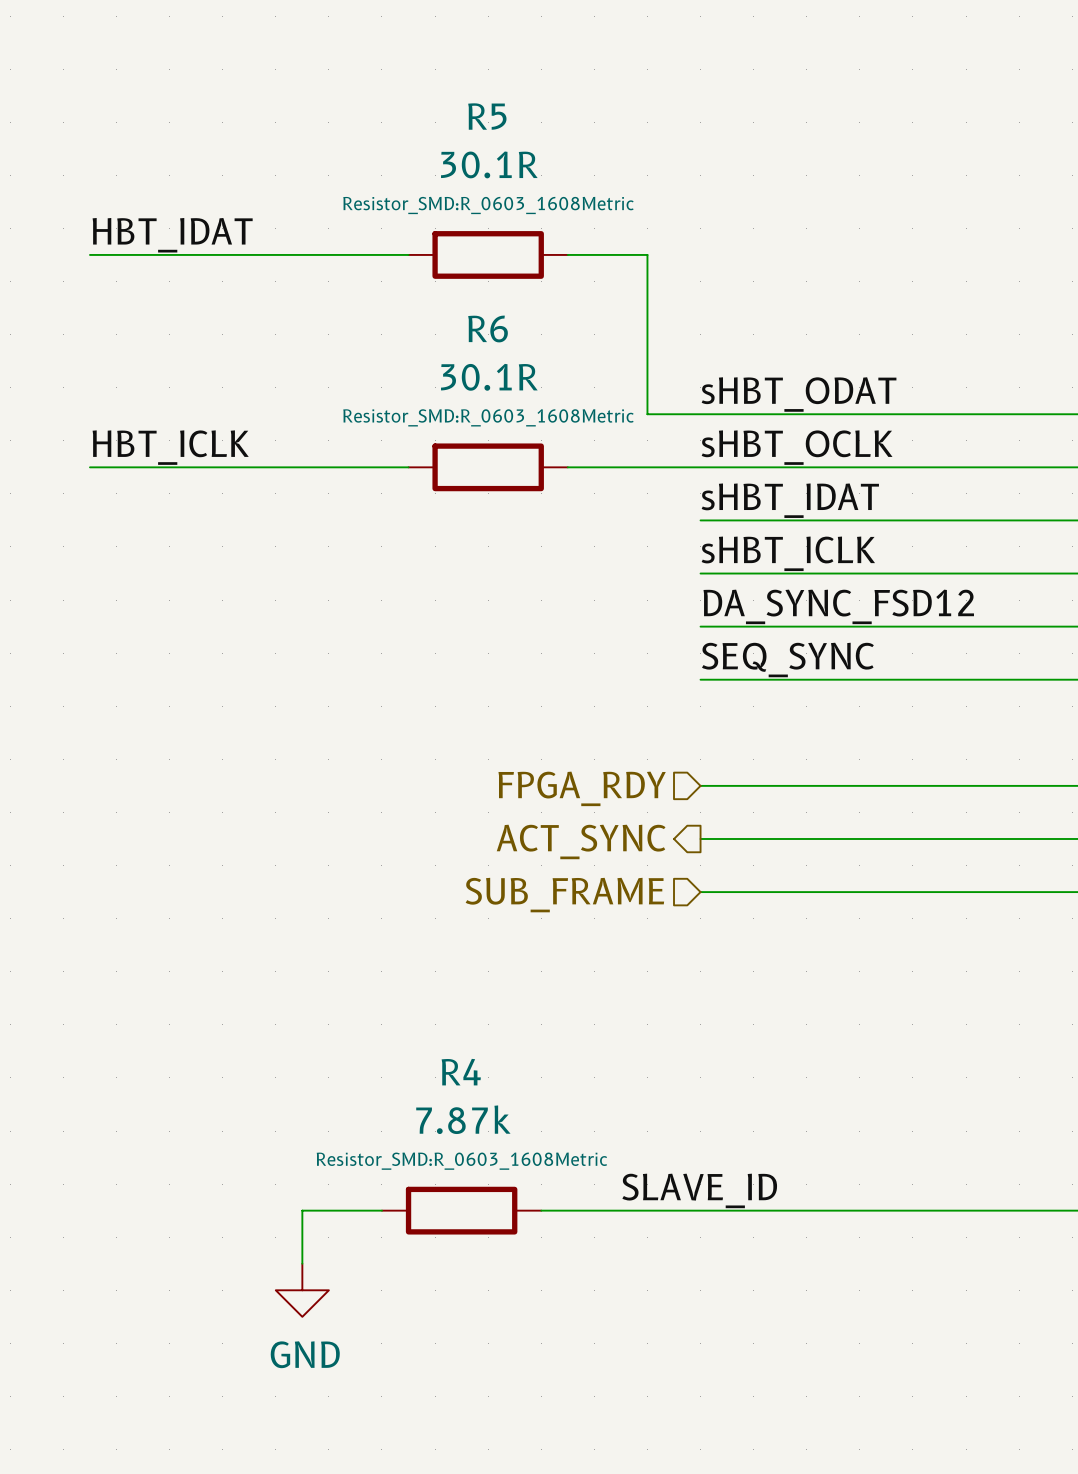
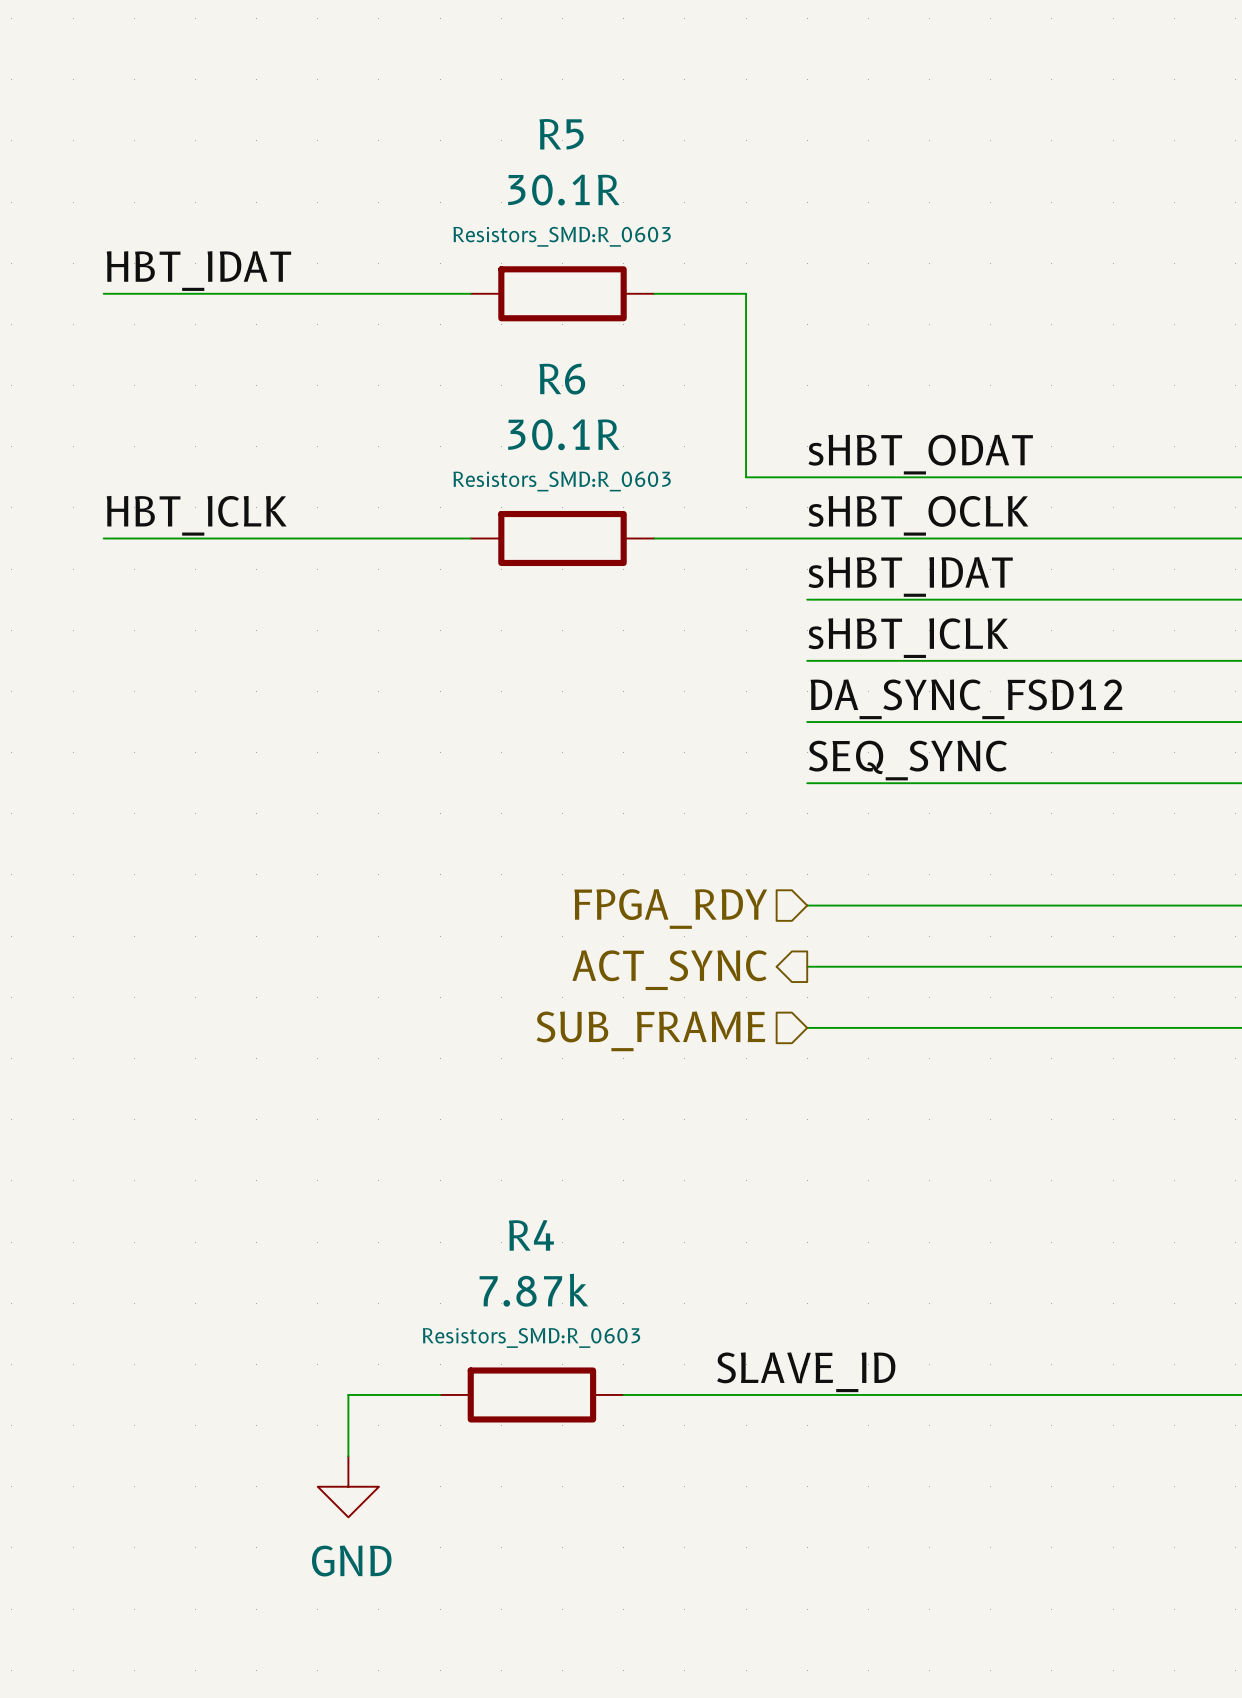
R5 text: Resistor_SMD:R_0603_1608Metric (488, 205) -> Resistors_SMD:R_0603 (562, 236)
R6 text: Resistor_SMD:R_0603_1608Metric (488, 417) -> Resistors_SMD:R_0603 (562, 481)
R4 text: Resistor_SMD:R_0603_1608Metric (461, 1161) -> Resistors_SMD:R_0603 (531, 1337)

